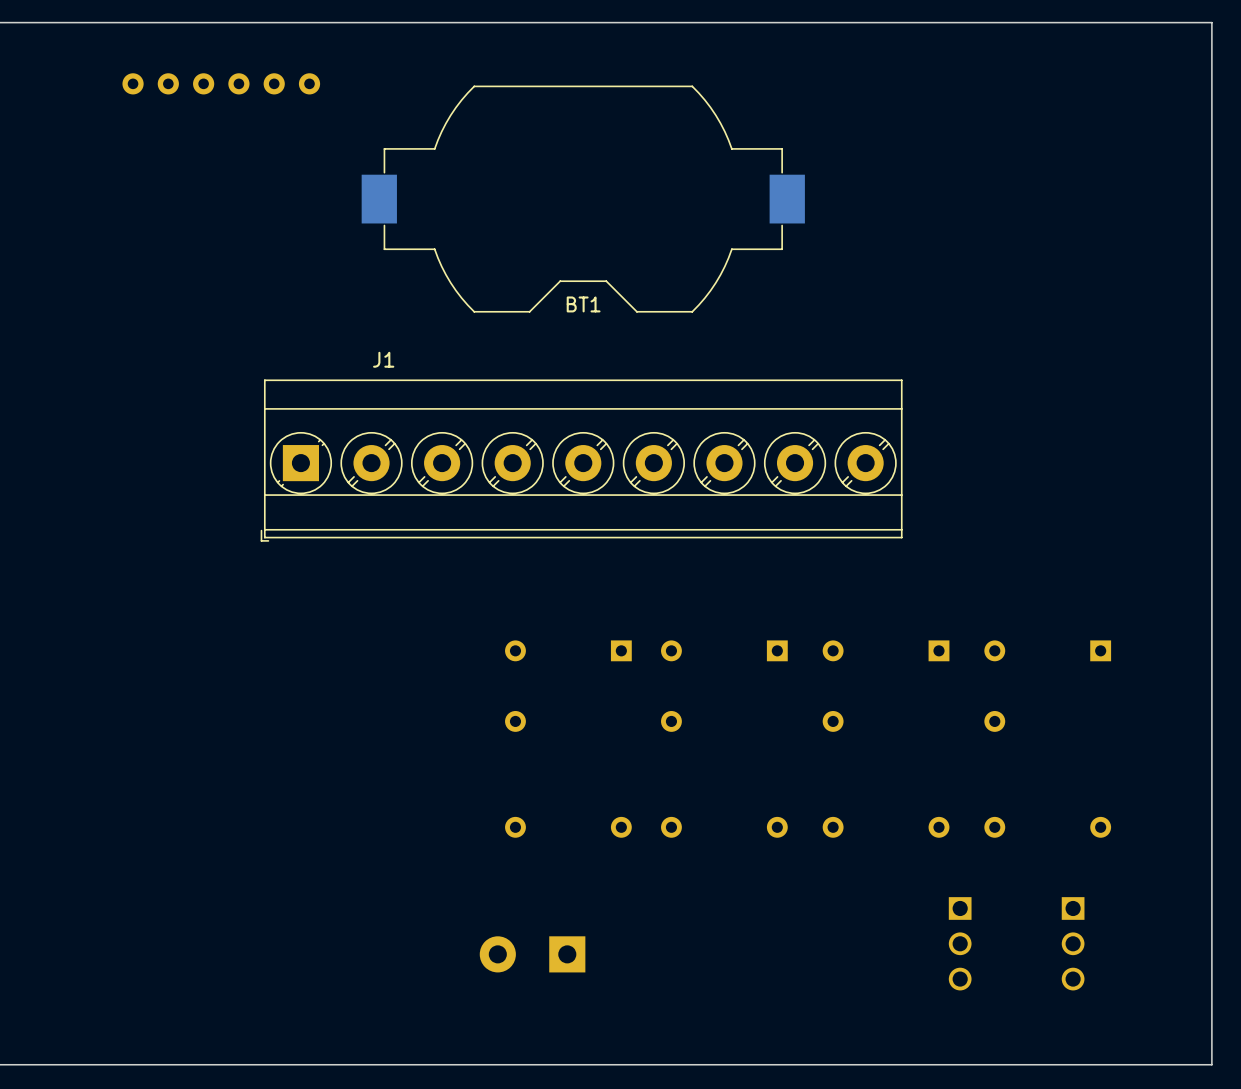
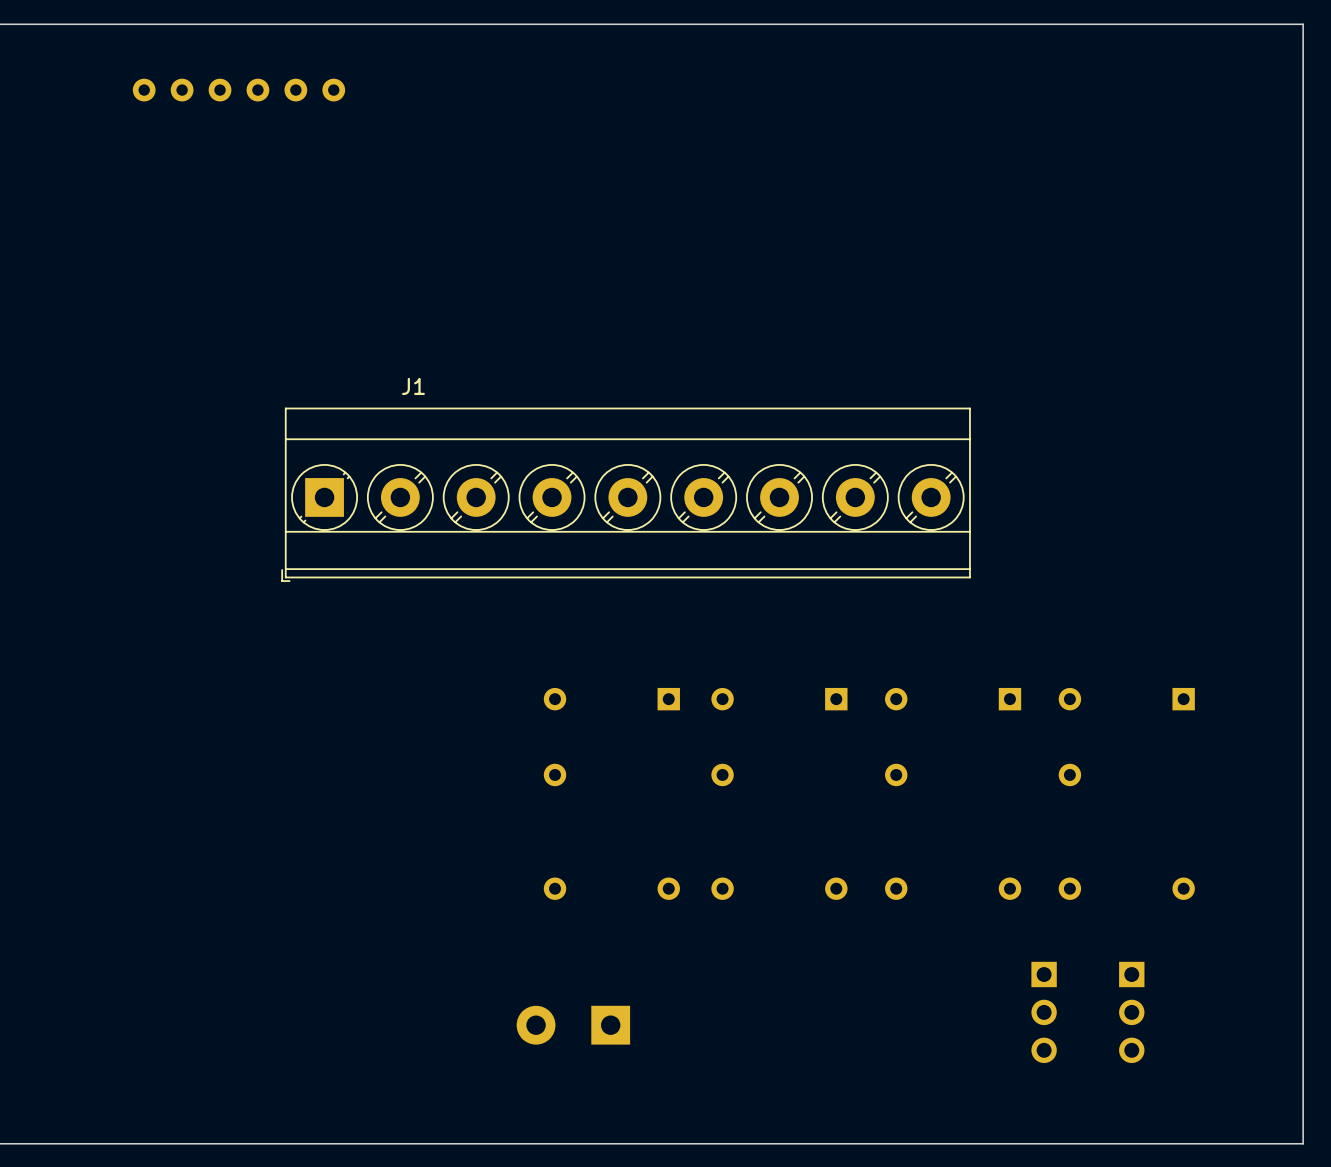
BT1: (583, 199) -> none
part footprint: [948, 897, 972, 991] -> [1031, 961, 1057, 1064]
part: none -> (1131, 1012)
part: (1073, 943) -> none

